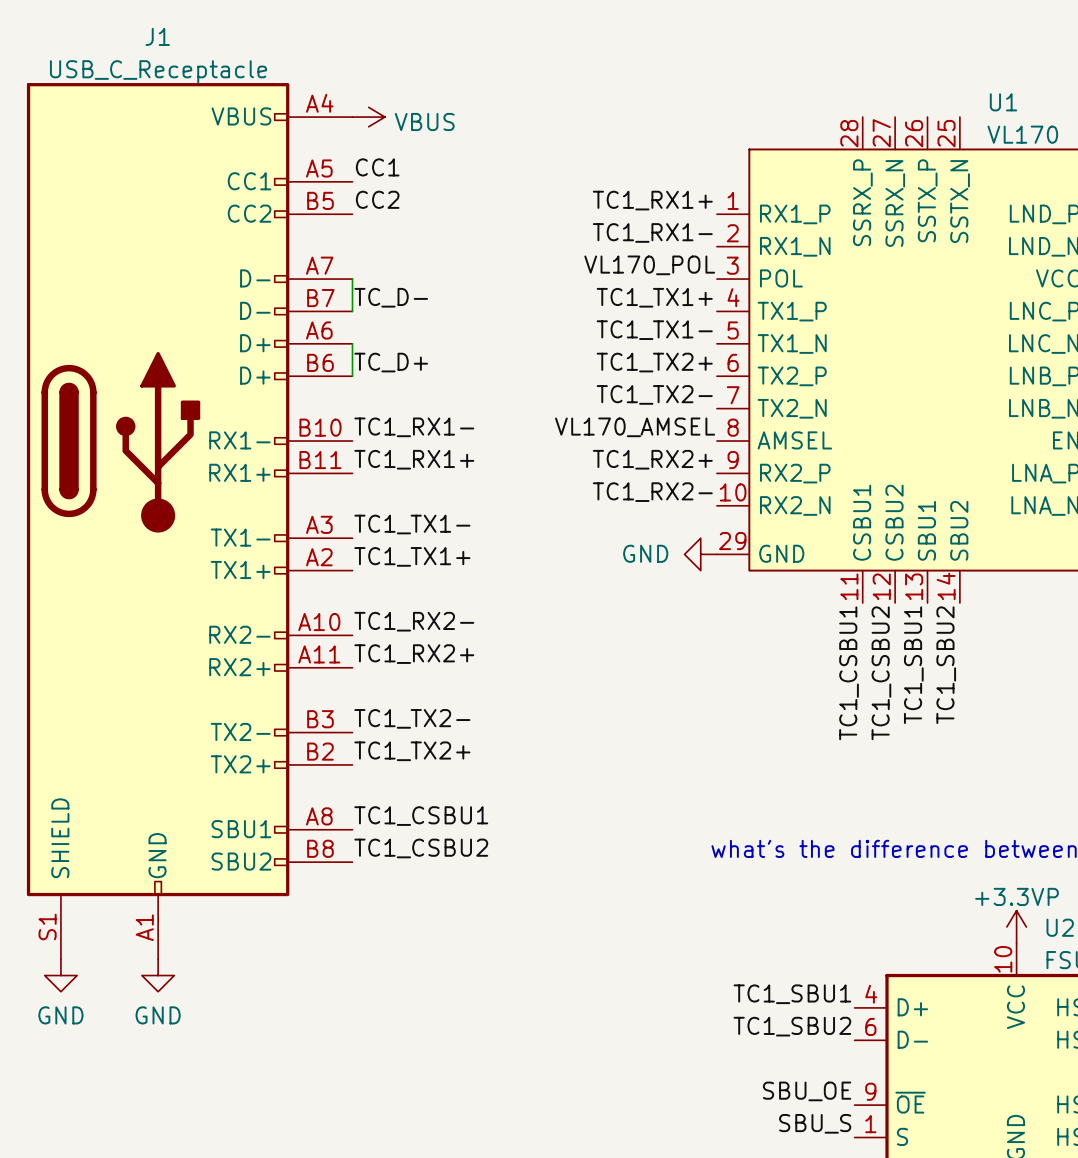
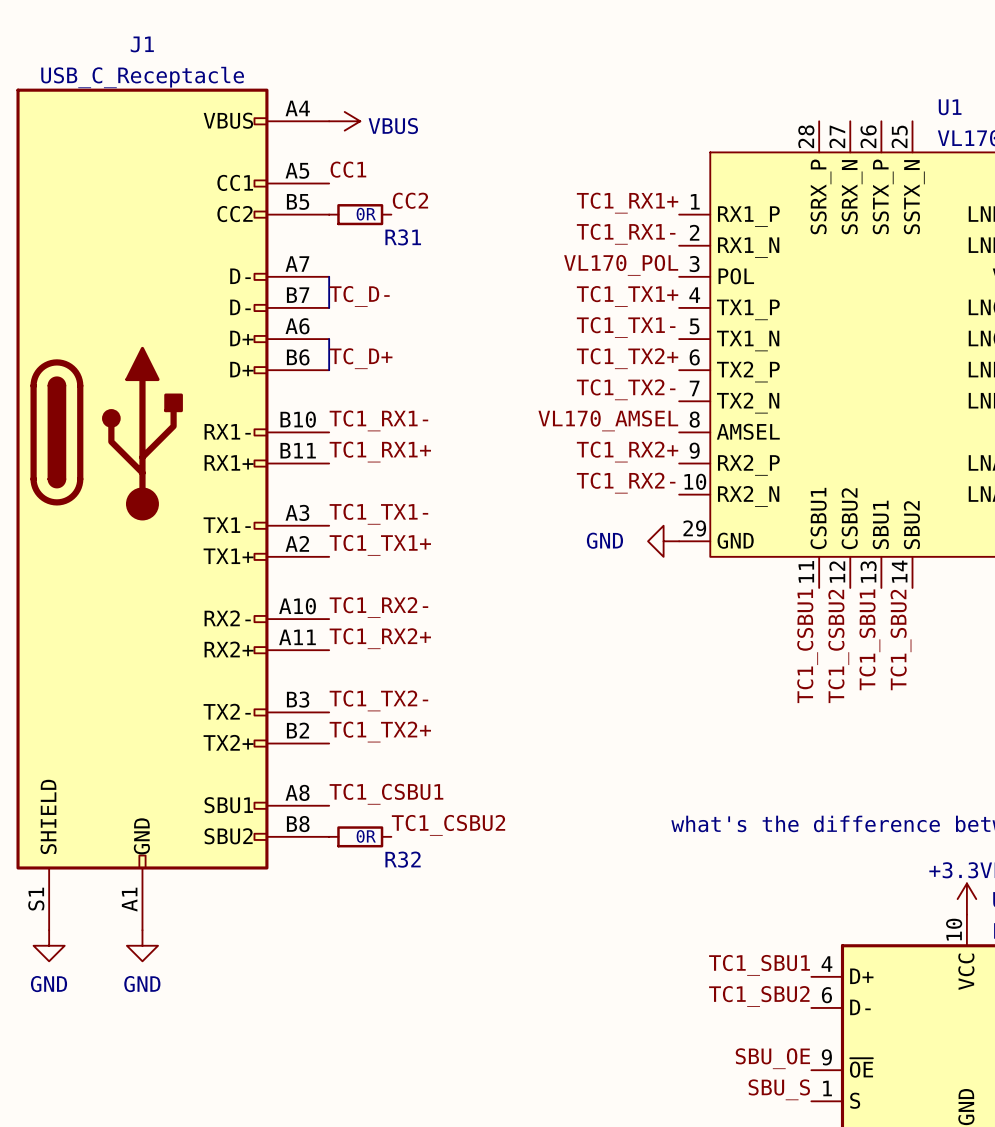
label position: CC2 (377, 199) -> CC2 (410, 200)
R31: none -> 0R (360, 214)
label position: TC1_CSBU2 (421, 848) -> TC1_CSBU2 (448, 825)
R32: none -> 0R (360, 836)

